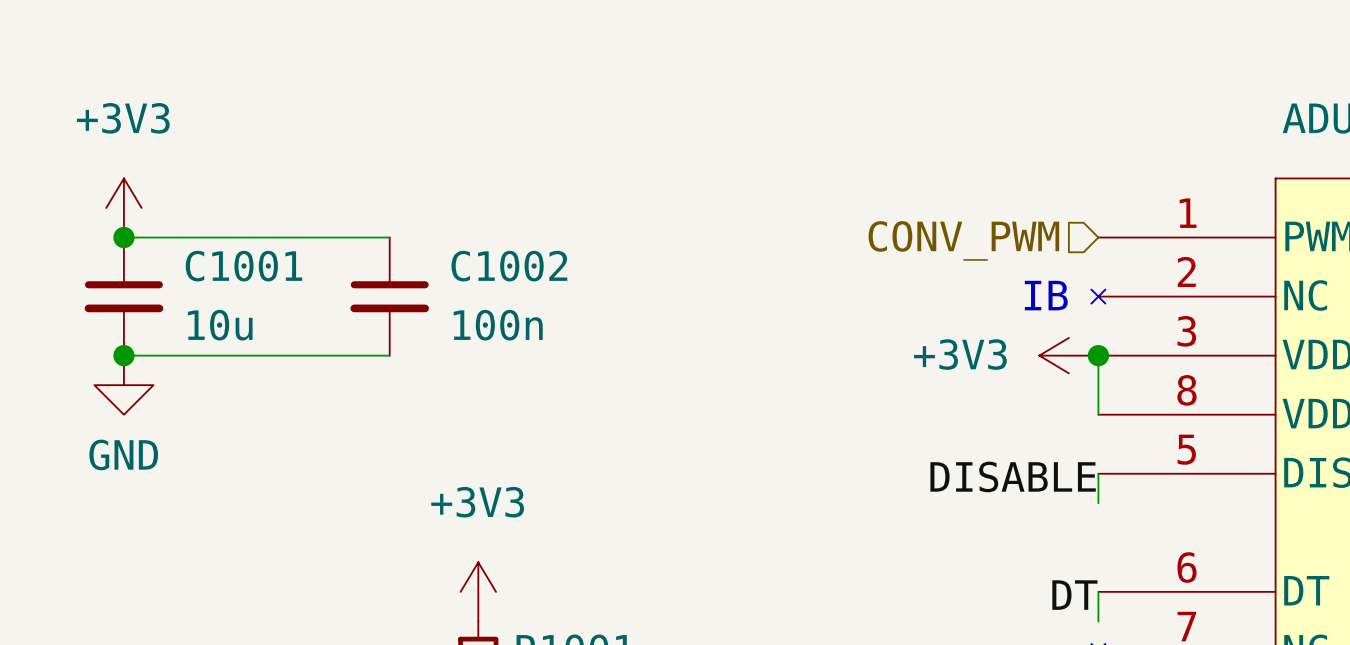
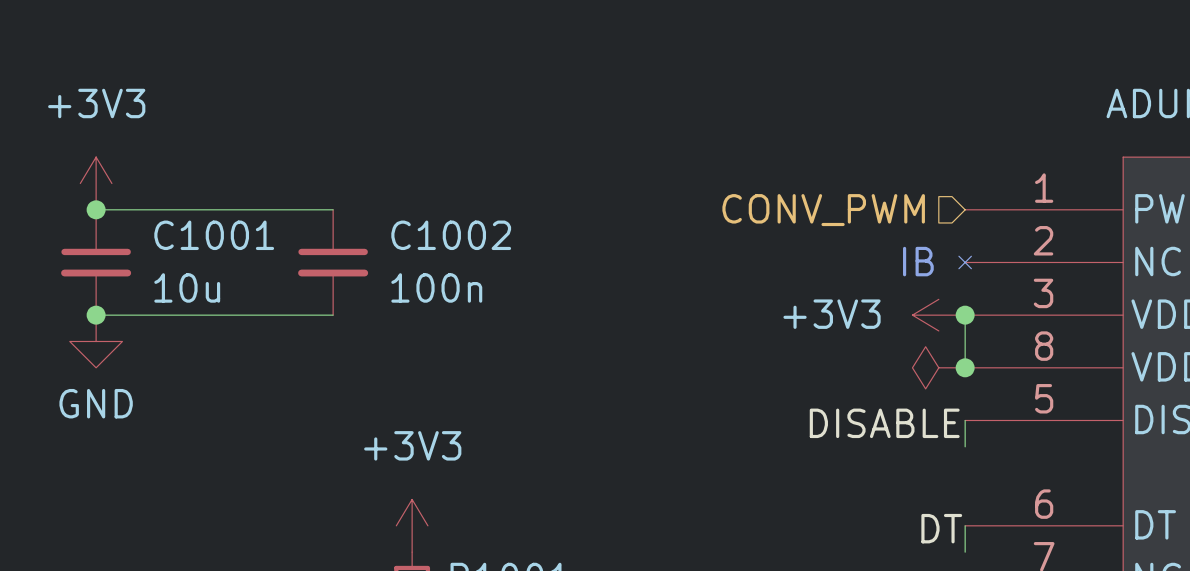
power symbol: none -> (938, 367)
junction: none -> (965, 367)

